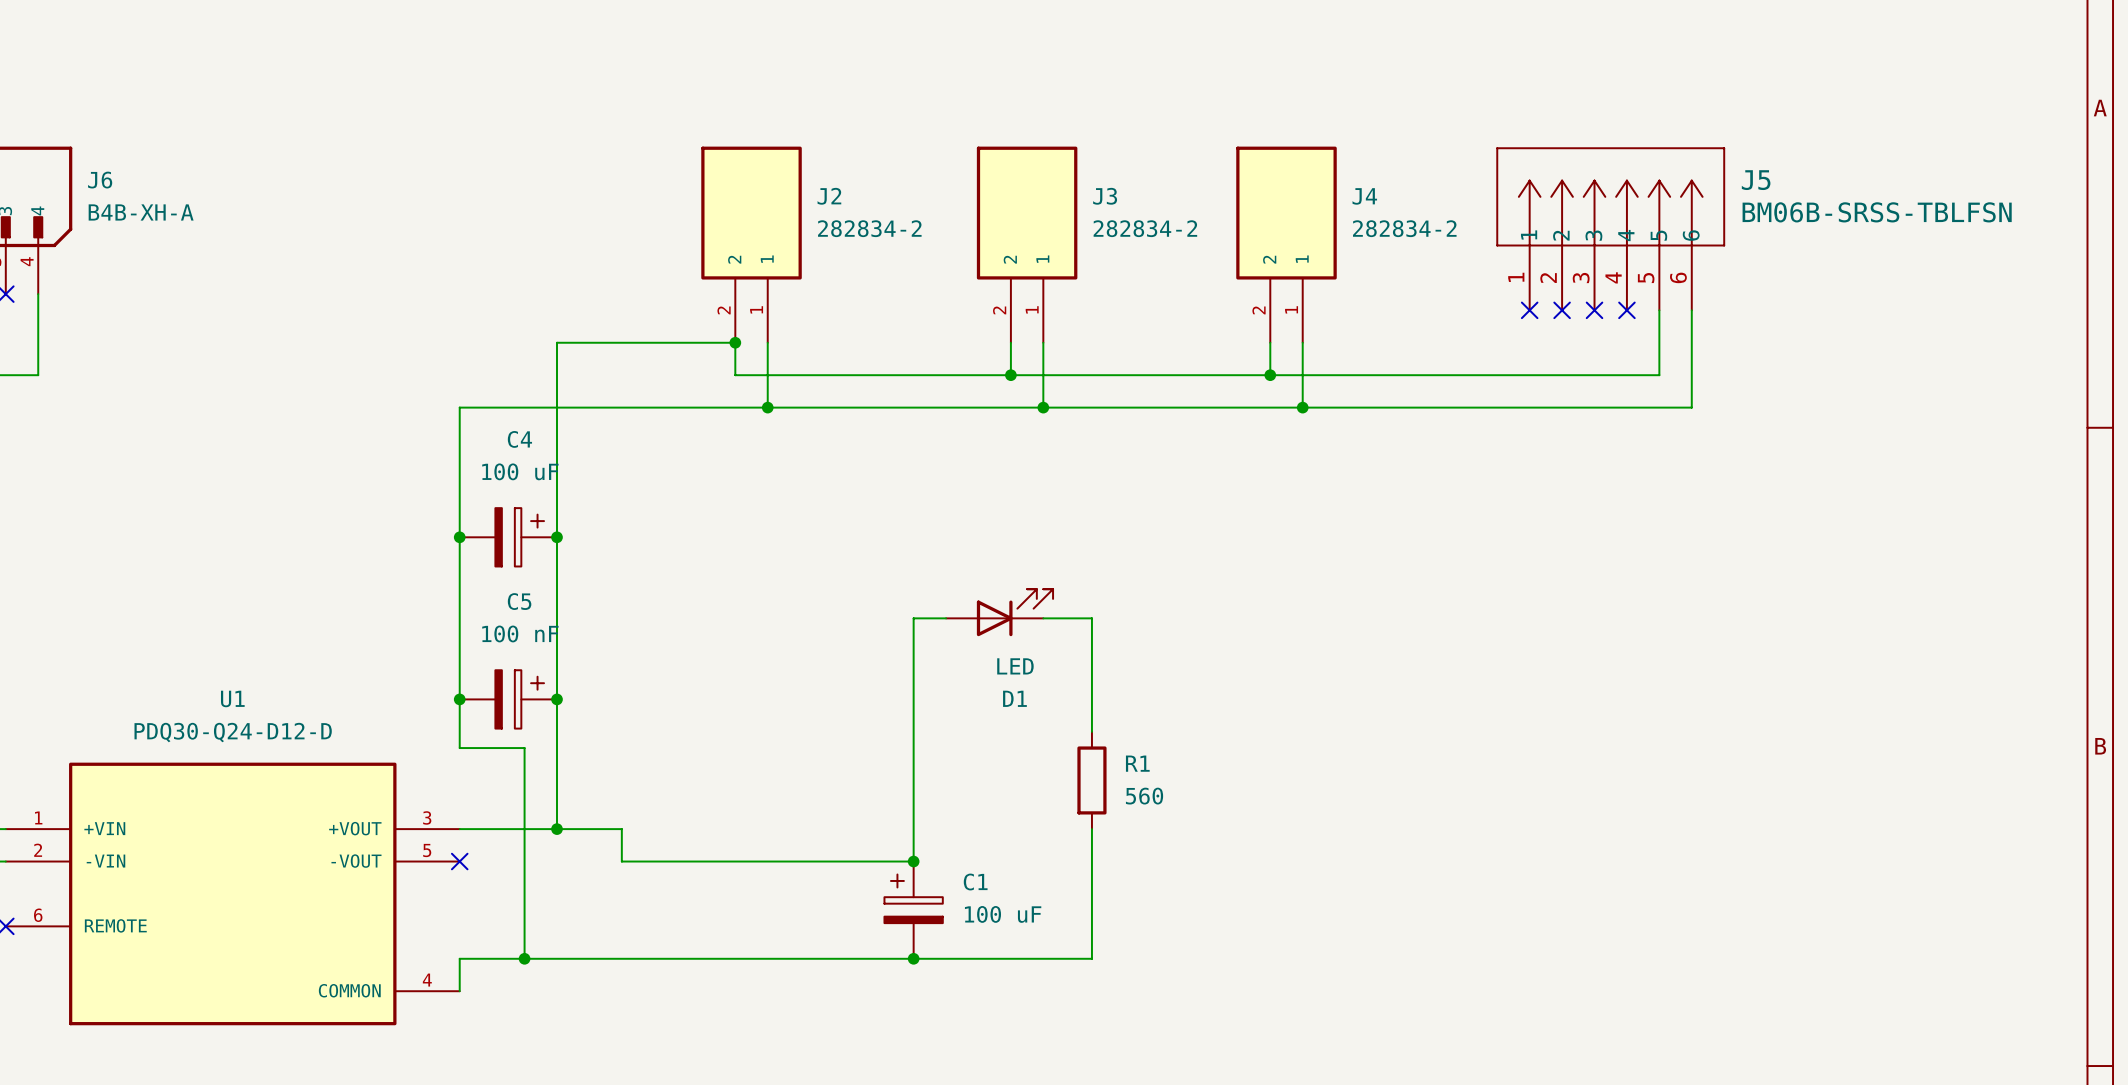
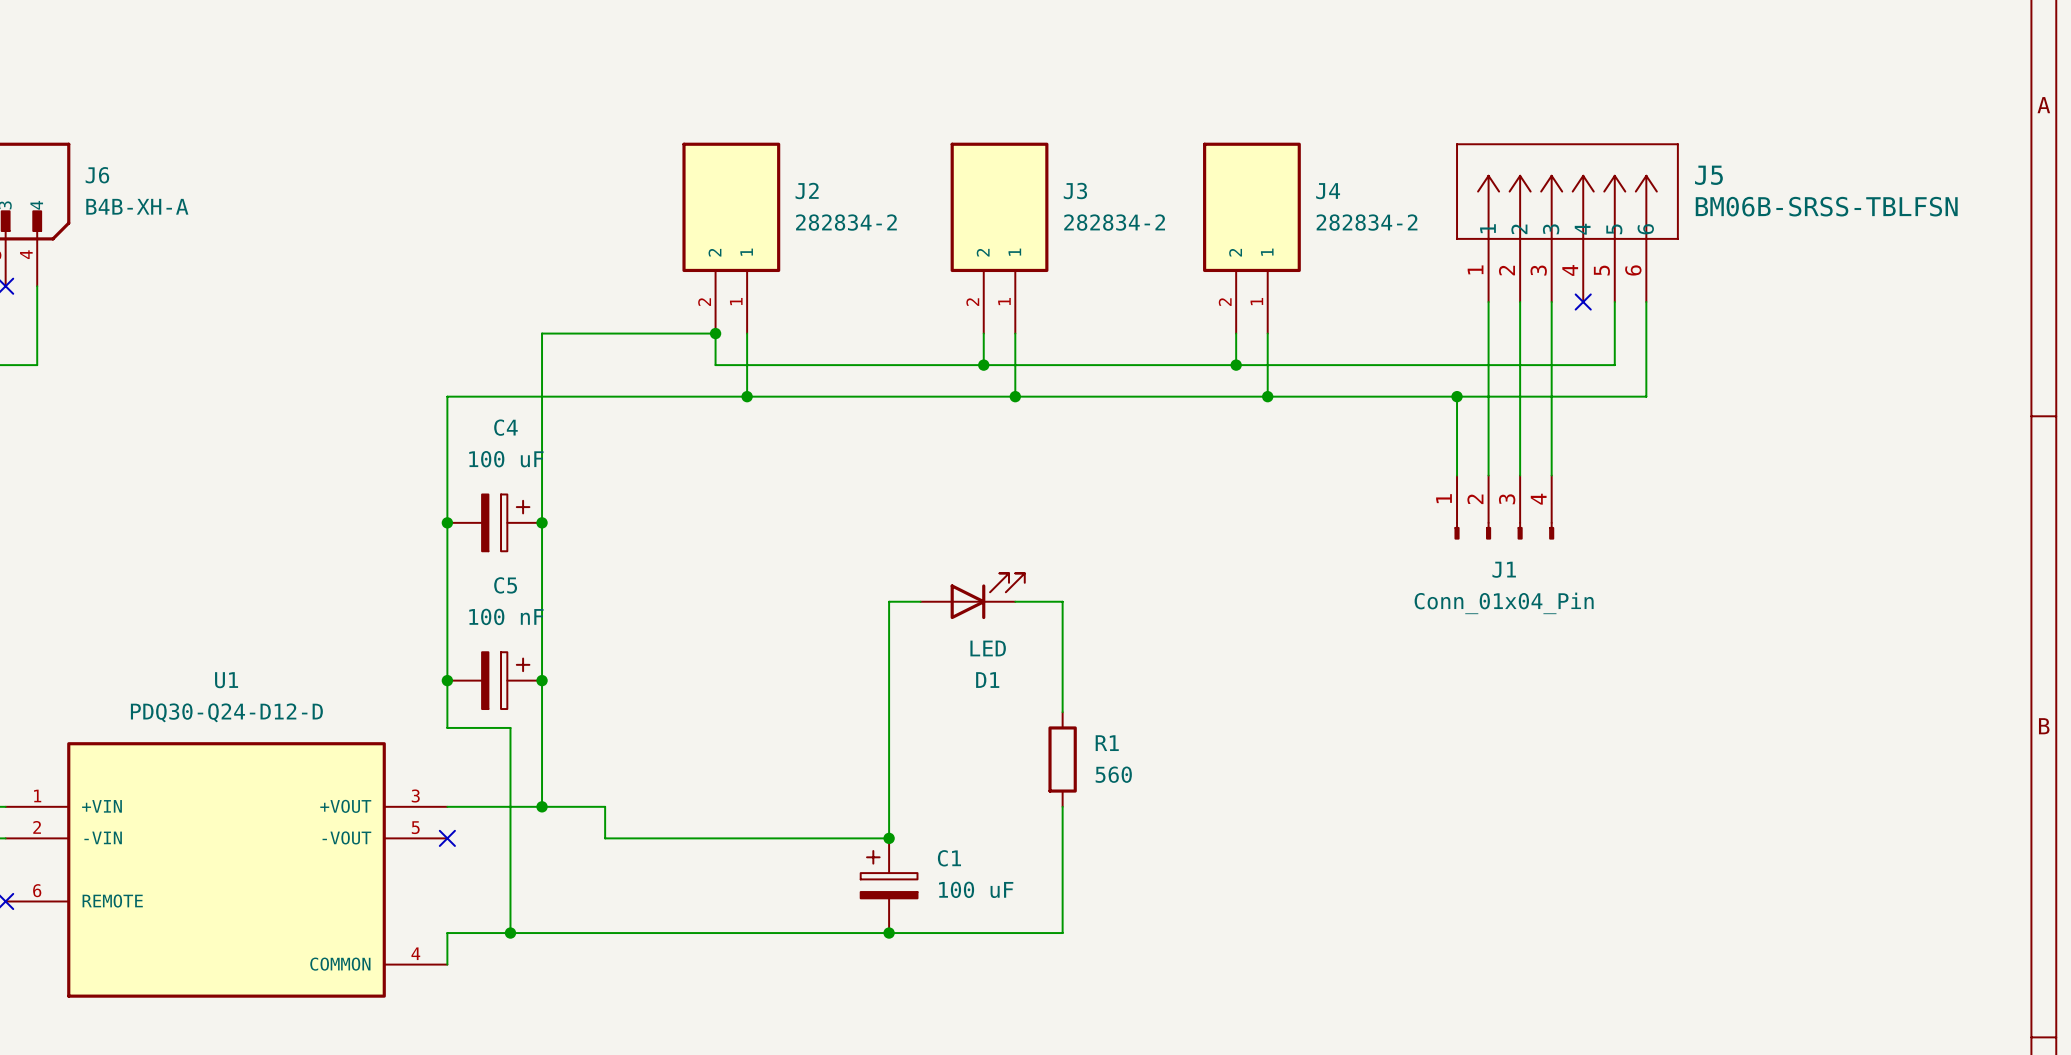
wire: none -> (1488, 302) (1488, 475)
no-connect mark: (1529, 310) -> none
wire: none -> (1520, 302) (1520, 475)
no-connect mark: (1562, 310) -> none
wire: none -> (1551, 302) (1551, 475)
no-connect mark: (1594, 310) -> none
wire: none -> (1457, 396) (1457, 475)
junction: none -> (1457, 396)
J1: none -> Conn_01x04_Pin (1504, 507)

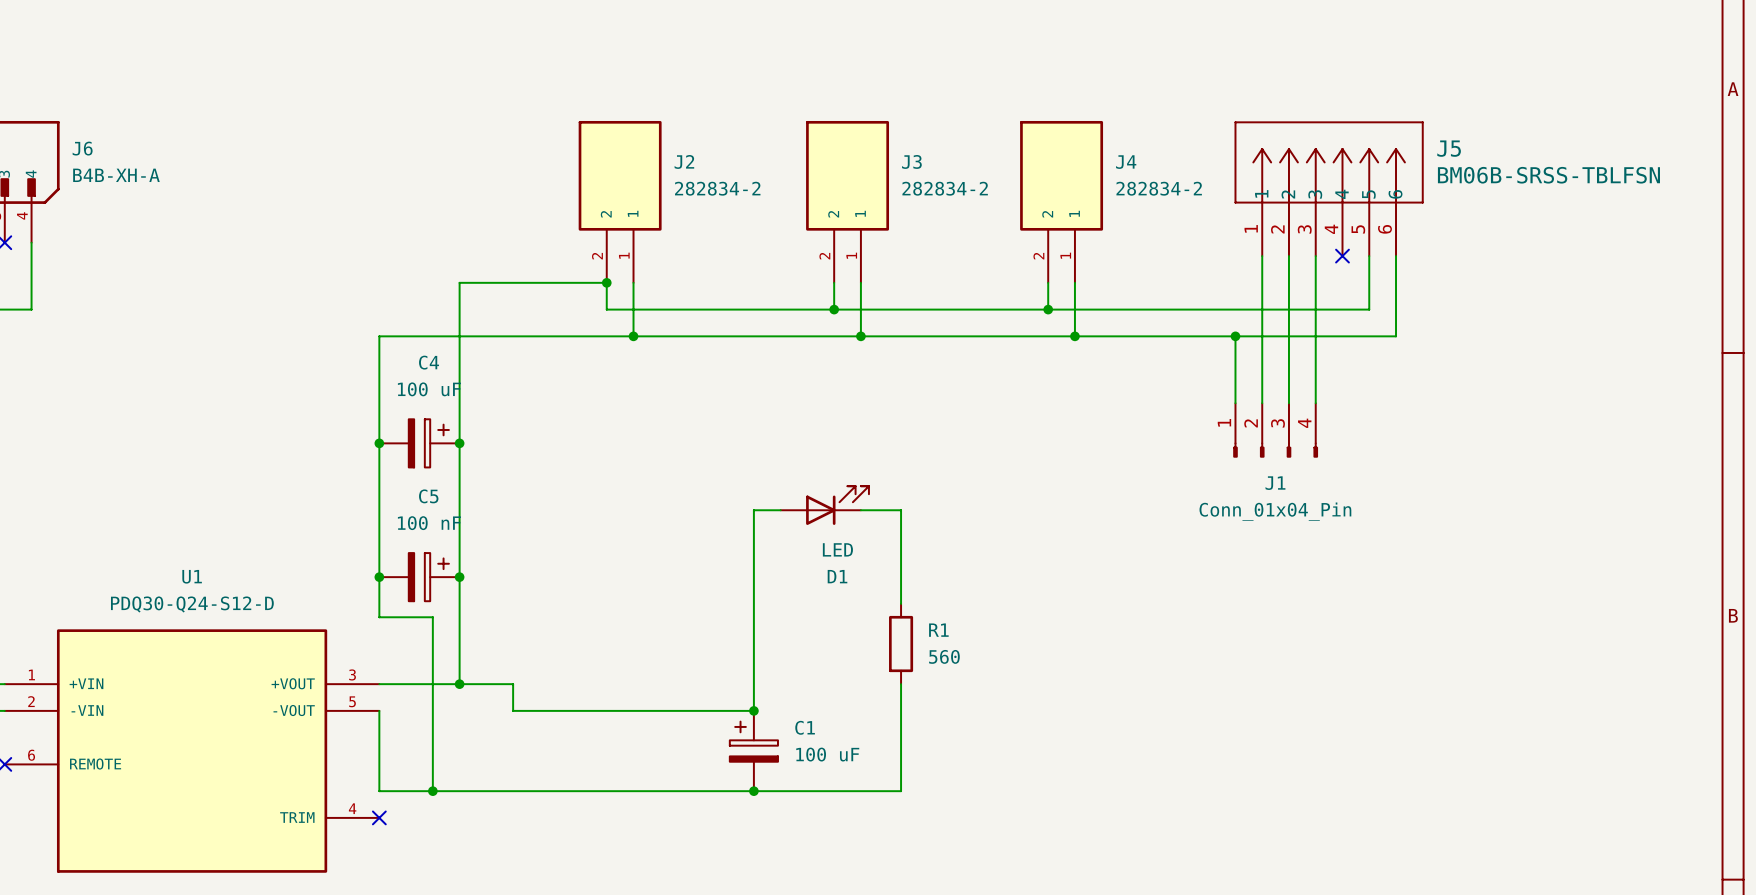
U1 value: PDQ30-Q24-D12-D (226, 712) -> PDQ30-Q24-S12-D (192, 604)
U1 symbol: [5, 742, 448, 998] -> [4, 629, 380, 873]
no-connect mark: (447, 838) -> none
wire: (447, 933) (447, 964) -> (379, 791) (379, 710)
no-connect mark: none -> (379, 817)

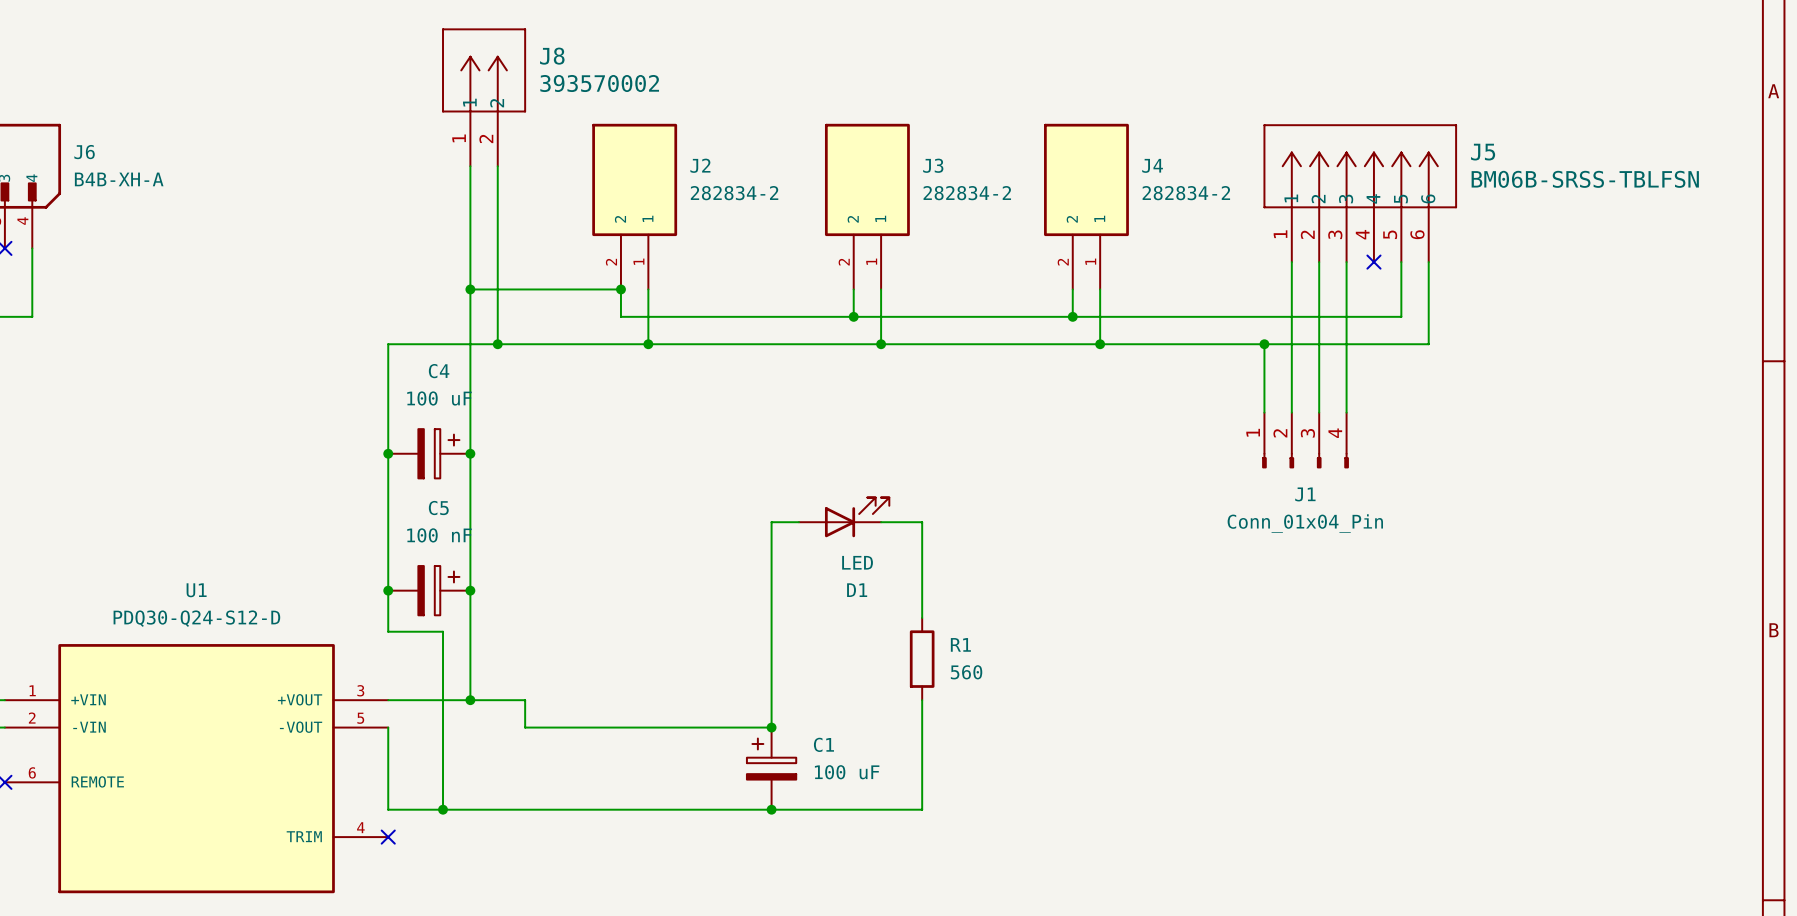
J8: none -> 393570002 (484, 97)
wire: none -> (470, 166) (470, 289)
wire: none -> (497, 166) (497, 344)
junction: none -> (470, 289)
junction: none -> (497, 344)

